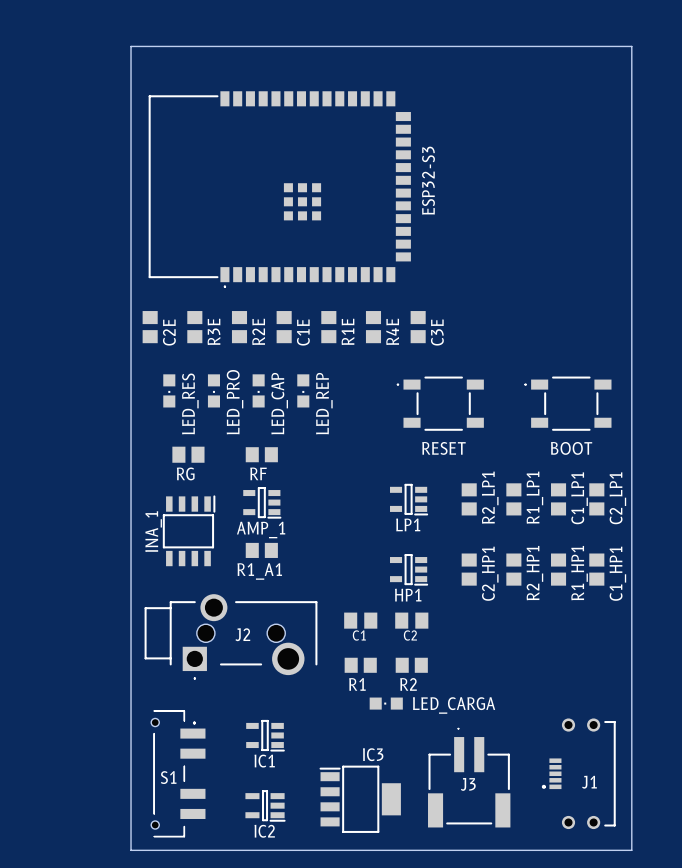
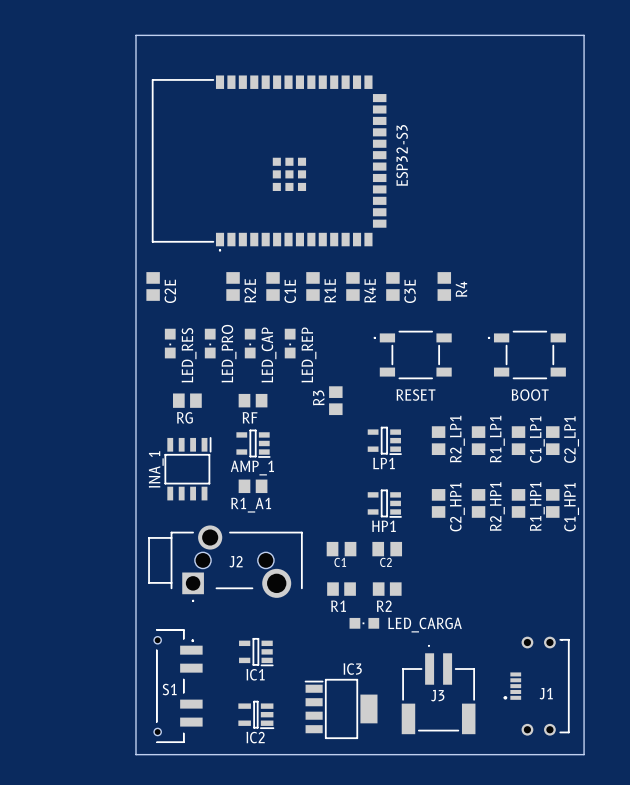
R3E: (194, 327) -> none
R4: none -> (444, 286)
R3: none -> (335, 400)

